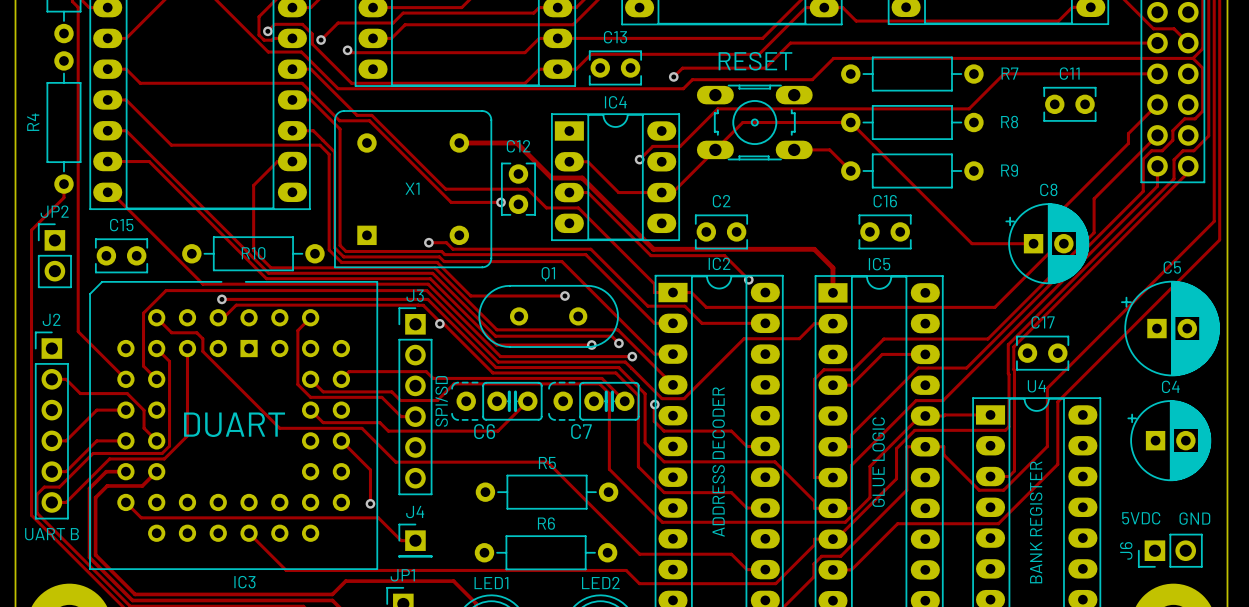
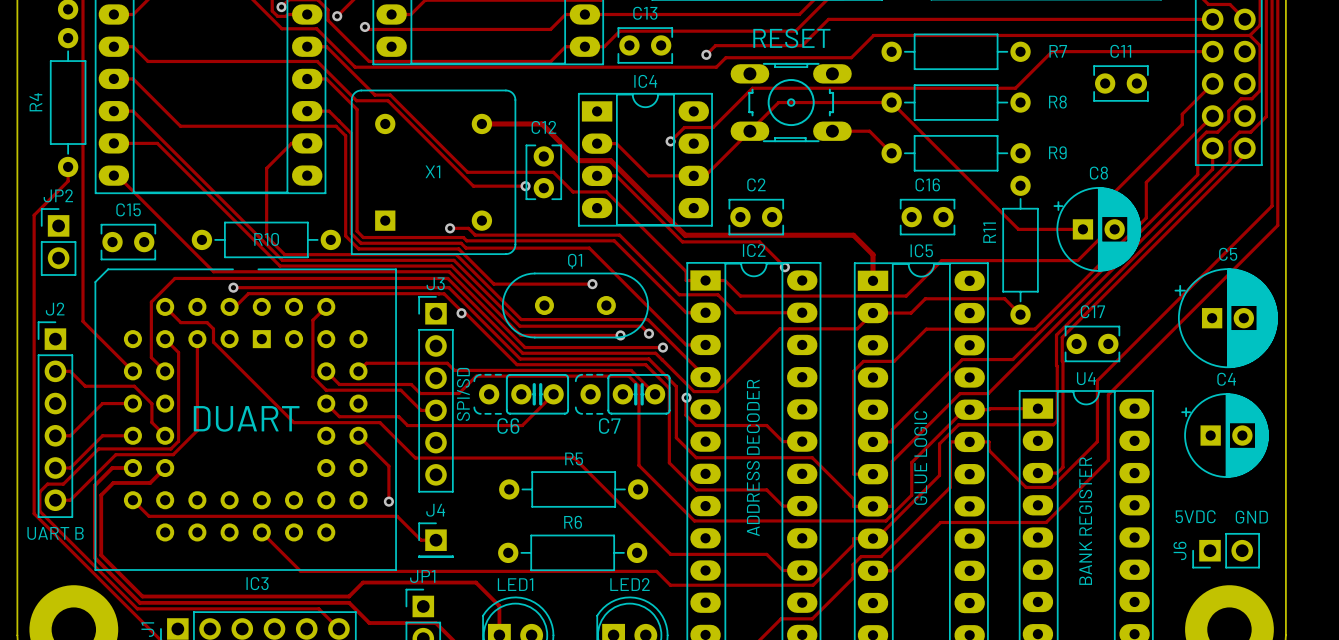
R11: none -> (1020, 250)
track: (1028, 273) (994, 307) (864, 307) -> (1077, 260) (941, 260) (906, 296)
track: (832, 323) (814, 323) (799, 338) -> (1020, 314) (1004, 298) (925, 298) (911, 313) (873, 313) (857, 328) (837, 328)
track: (925, 354) (882, 354) (851, 385) (832, 385) -> none

